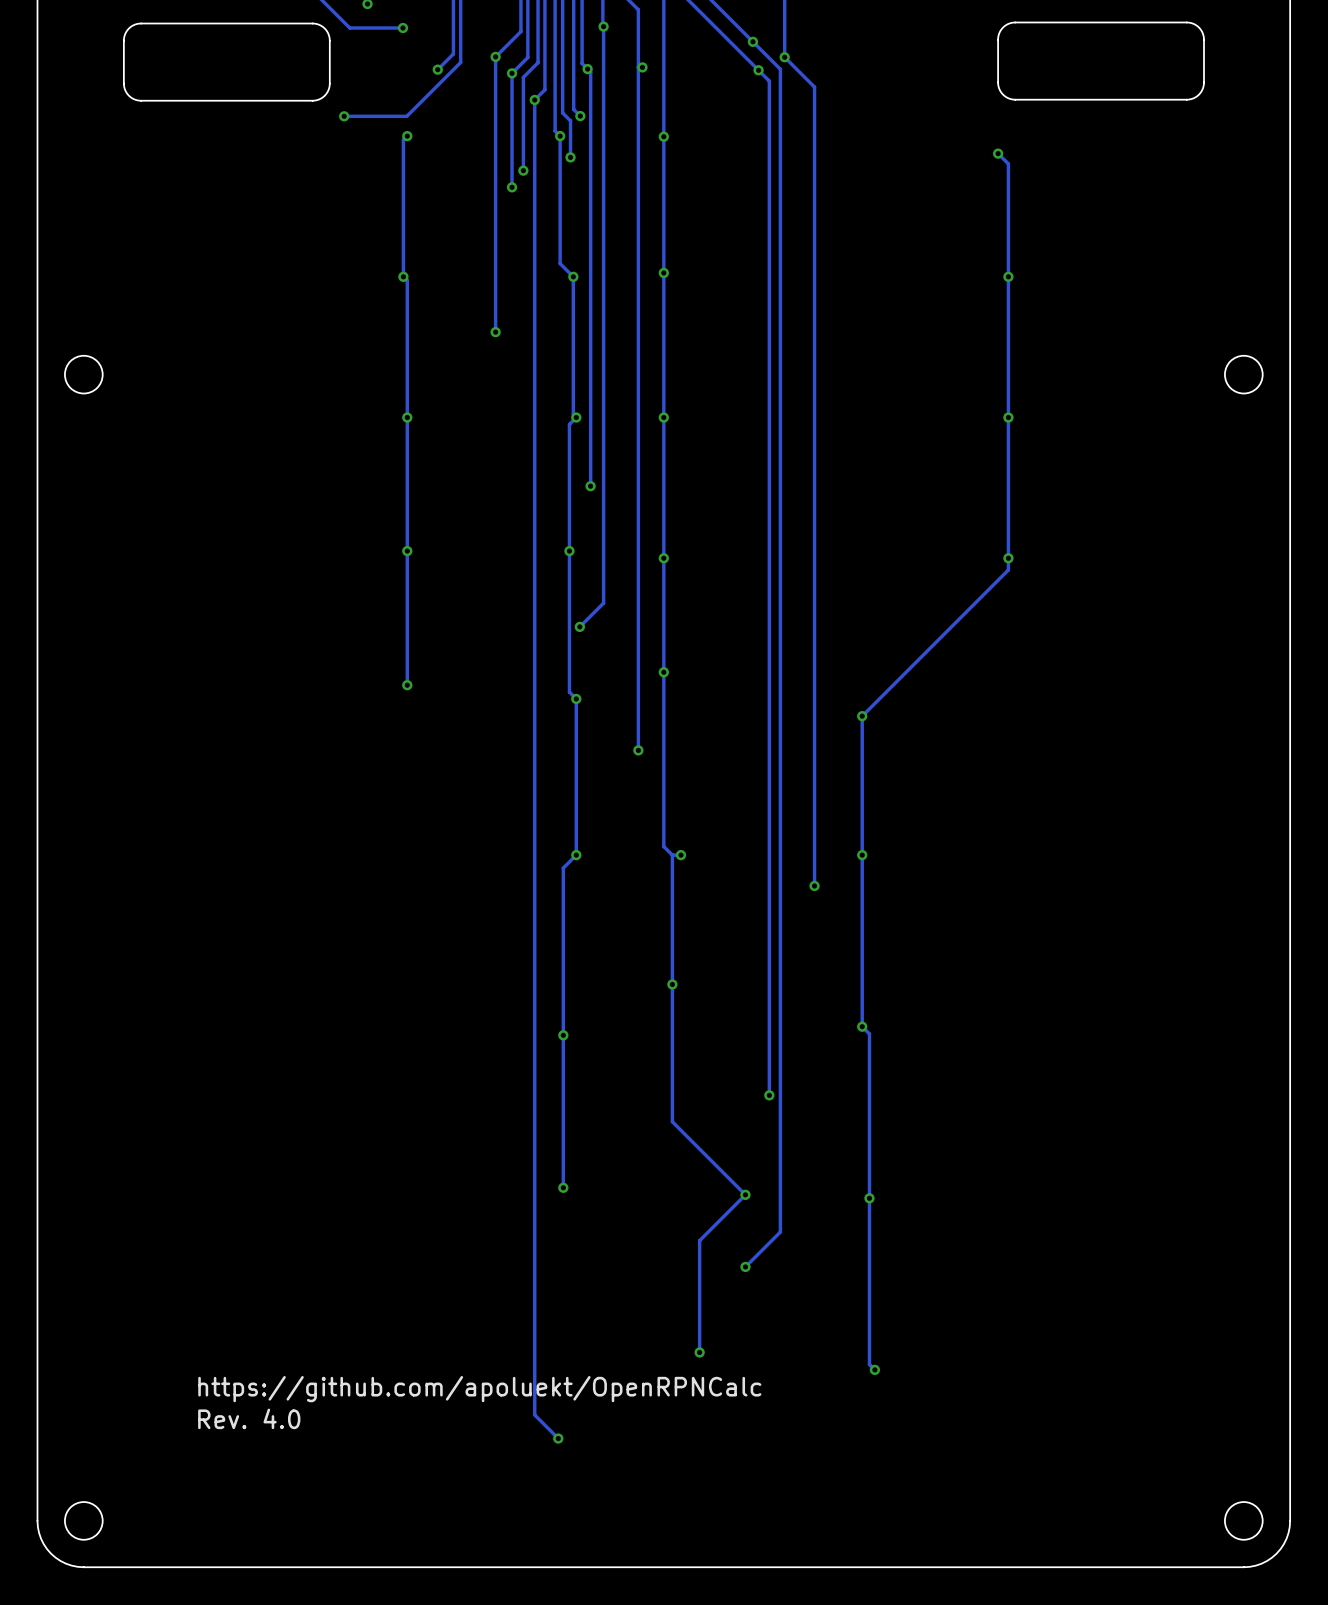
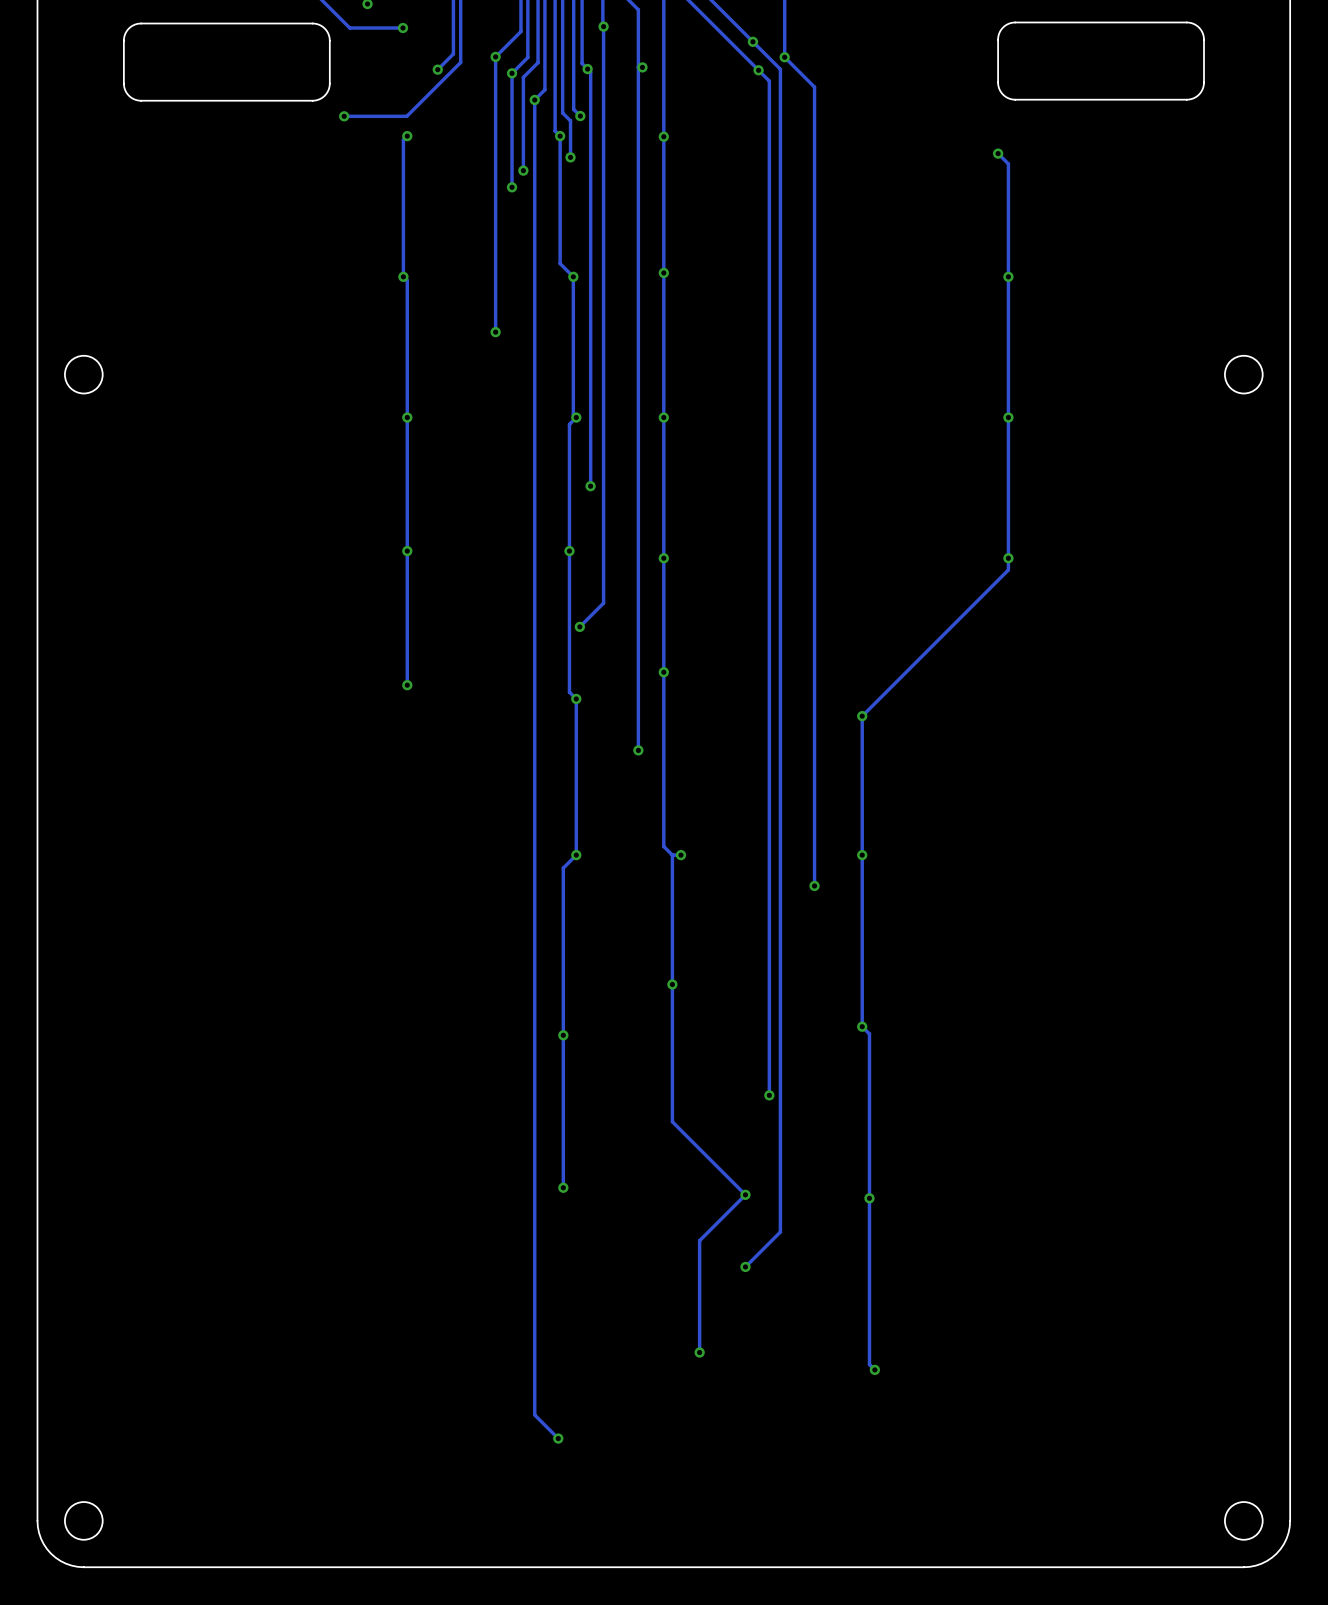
text: https://github.com/apoluekt/OpenRPNCalc (479, 1389) -> none
text: Rev. 4.0 (249, 1418) -> none

